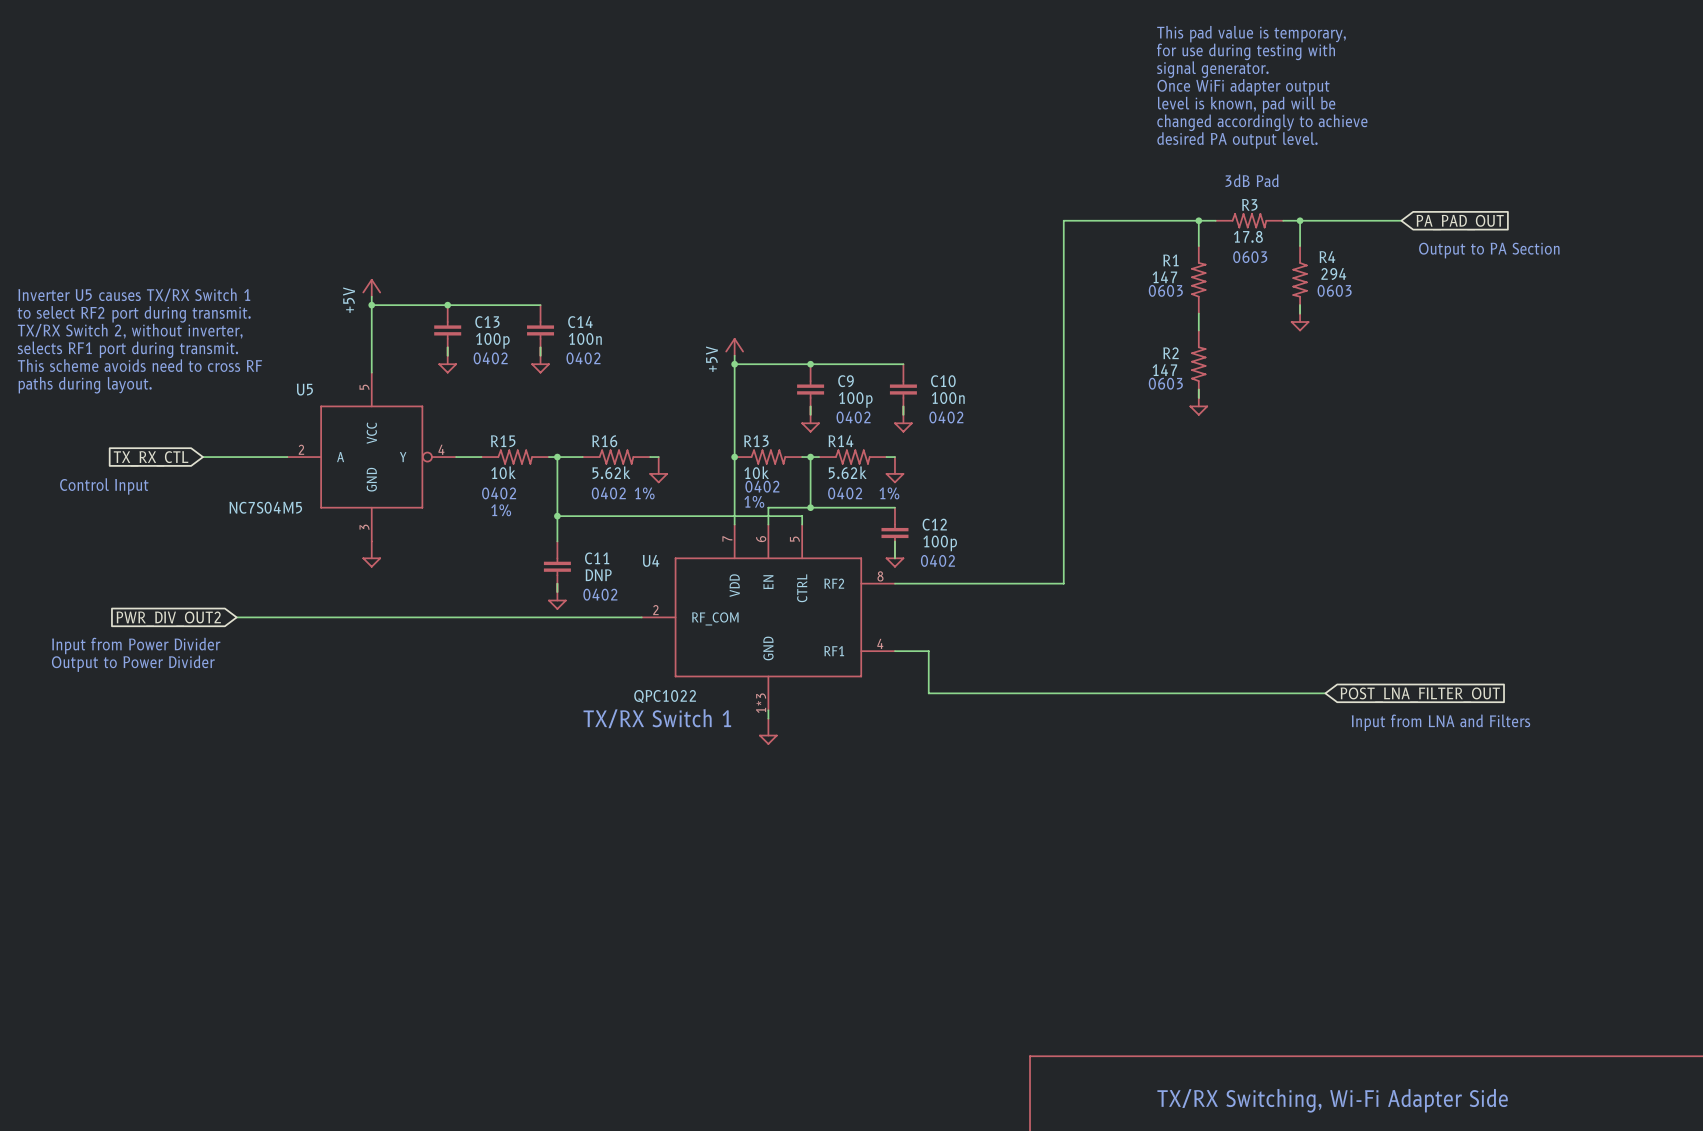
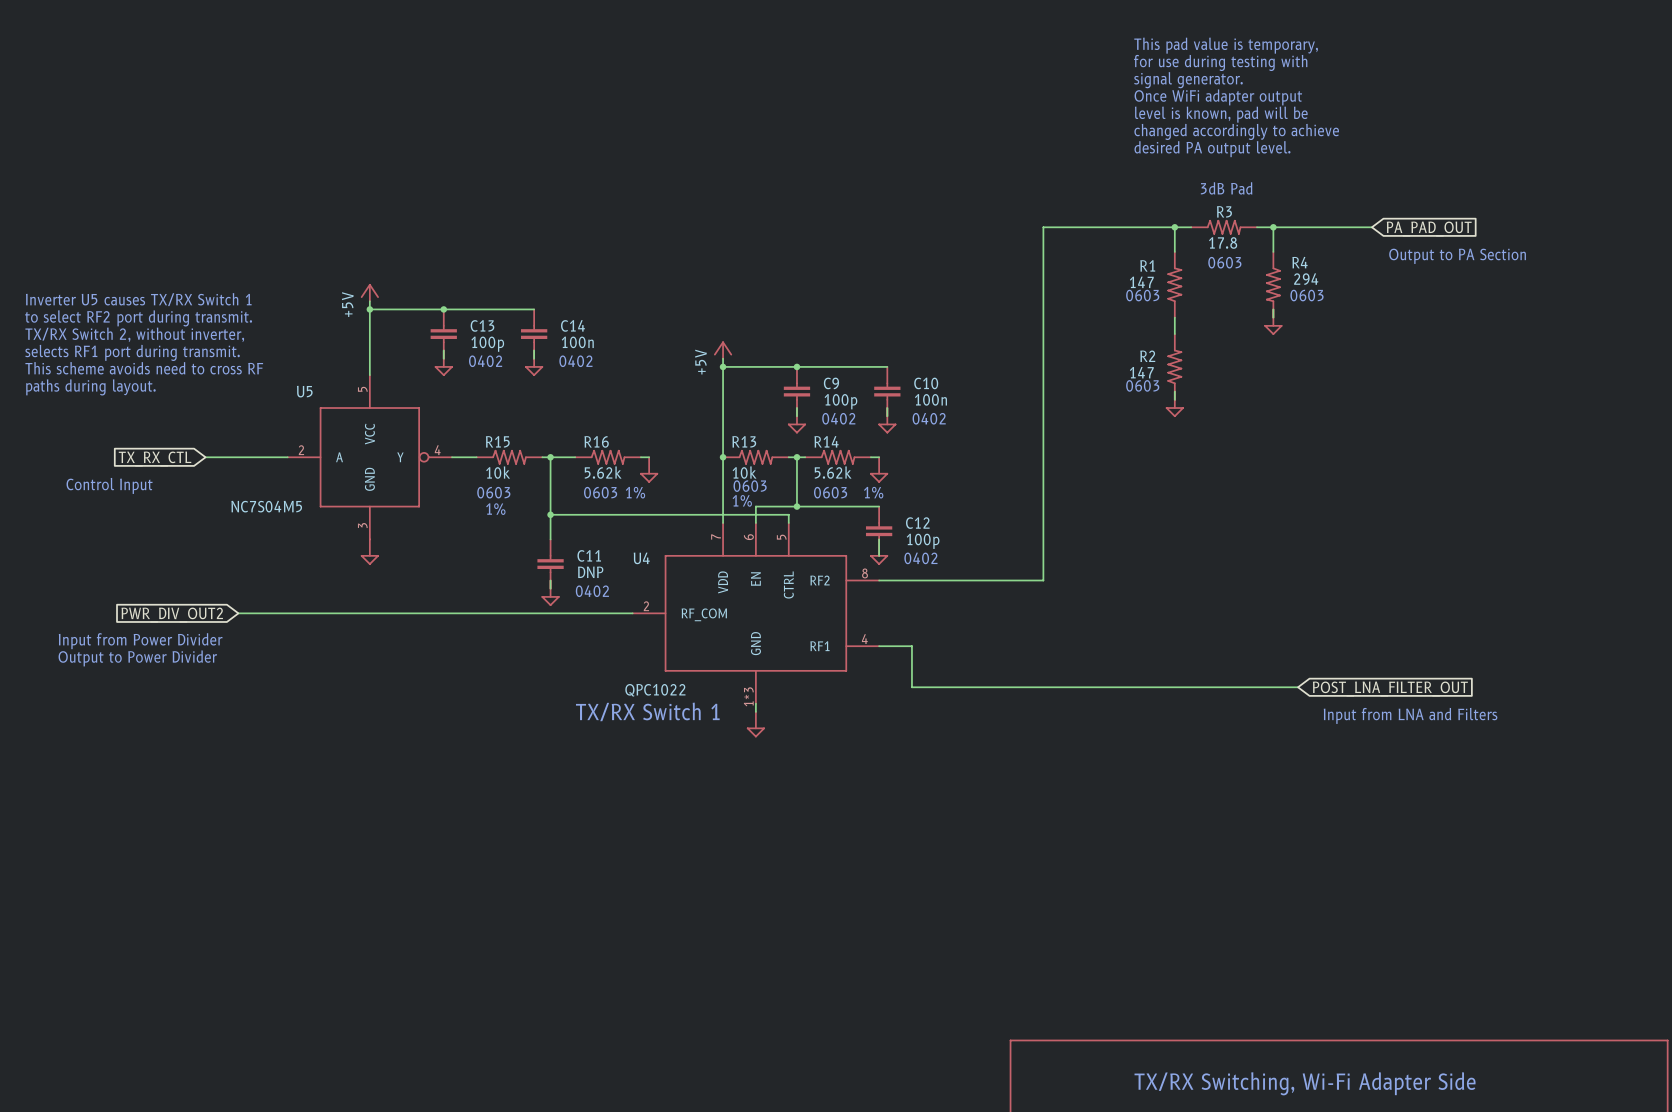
text: 0402 (762, 486) -> 0603 (750, 486)
text: 0402 (499, 493) -> 0603 (493, 492)
text: 0402 (608, 493) -> 0603 (600, 492)
text: 0402 (845, 493) -> 0603 (830, 492)

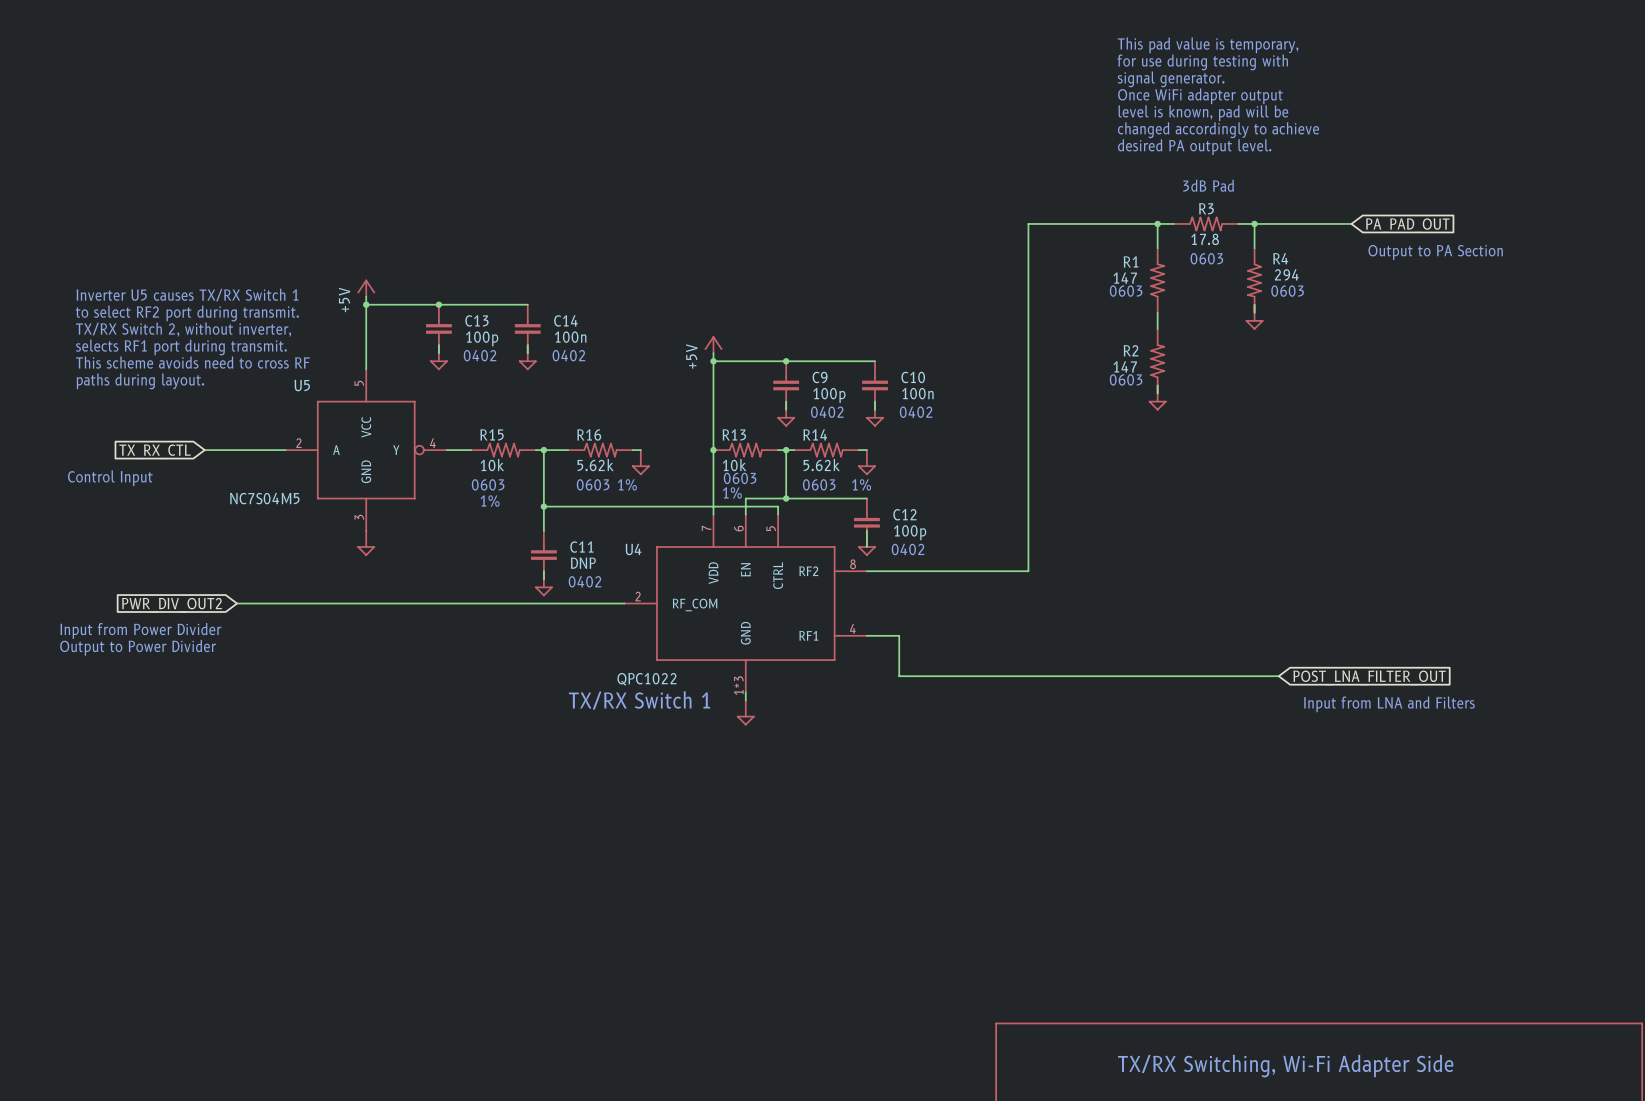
text position: Inverter U5 causes TX/RX Switch 1 (138, 299) -> Inverter U5 causes TX/RX Switch 1 (187, 295)
text position: to select RF2 port during transmit. (138, 318) -> to select RF2 port during transmit. (187, 313)
text position: TX/RX Switch 2, without inverter, (134, 334) -> TX/RX Switch 2, without inverter, (183, 329)
text position: selects RF1 port during transmit. (132, 352) -> selects RF1 port during transmit. (181, 347)
text position: This scheme avoids need to cross RF (144, 368) -> This scheme avoids need to cross RF (192, 362)
text position: paths during layout. (90, 387) -> paths during layout. (140, 381)

